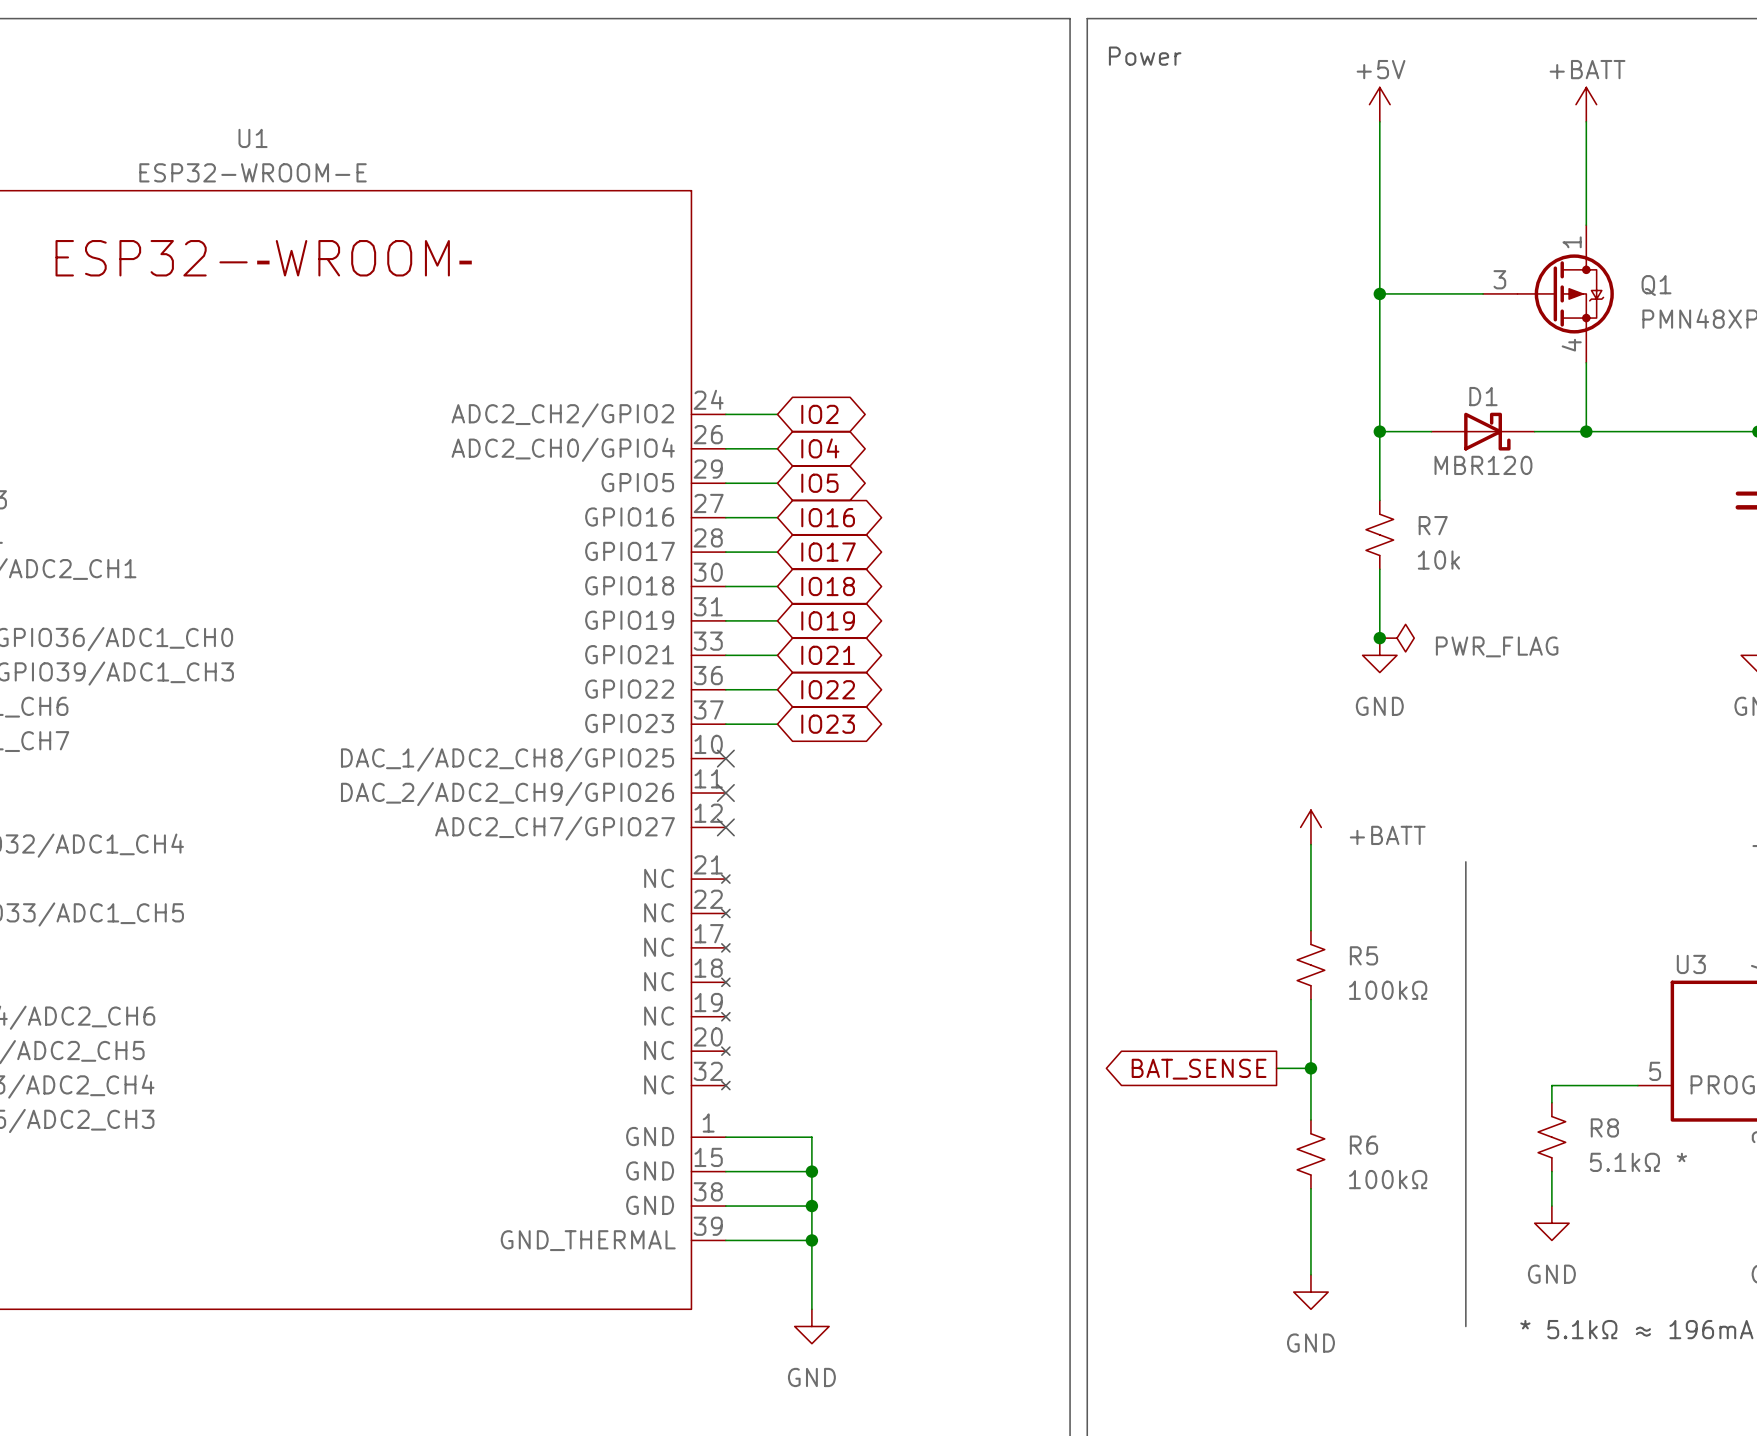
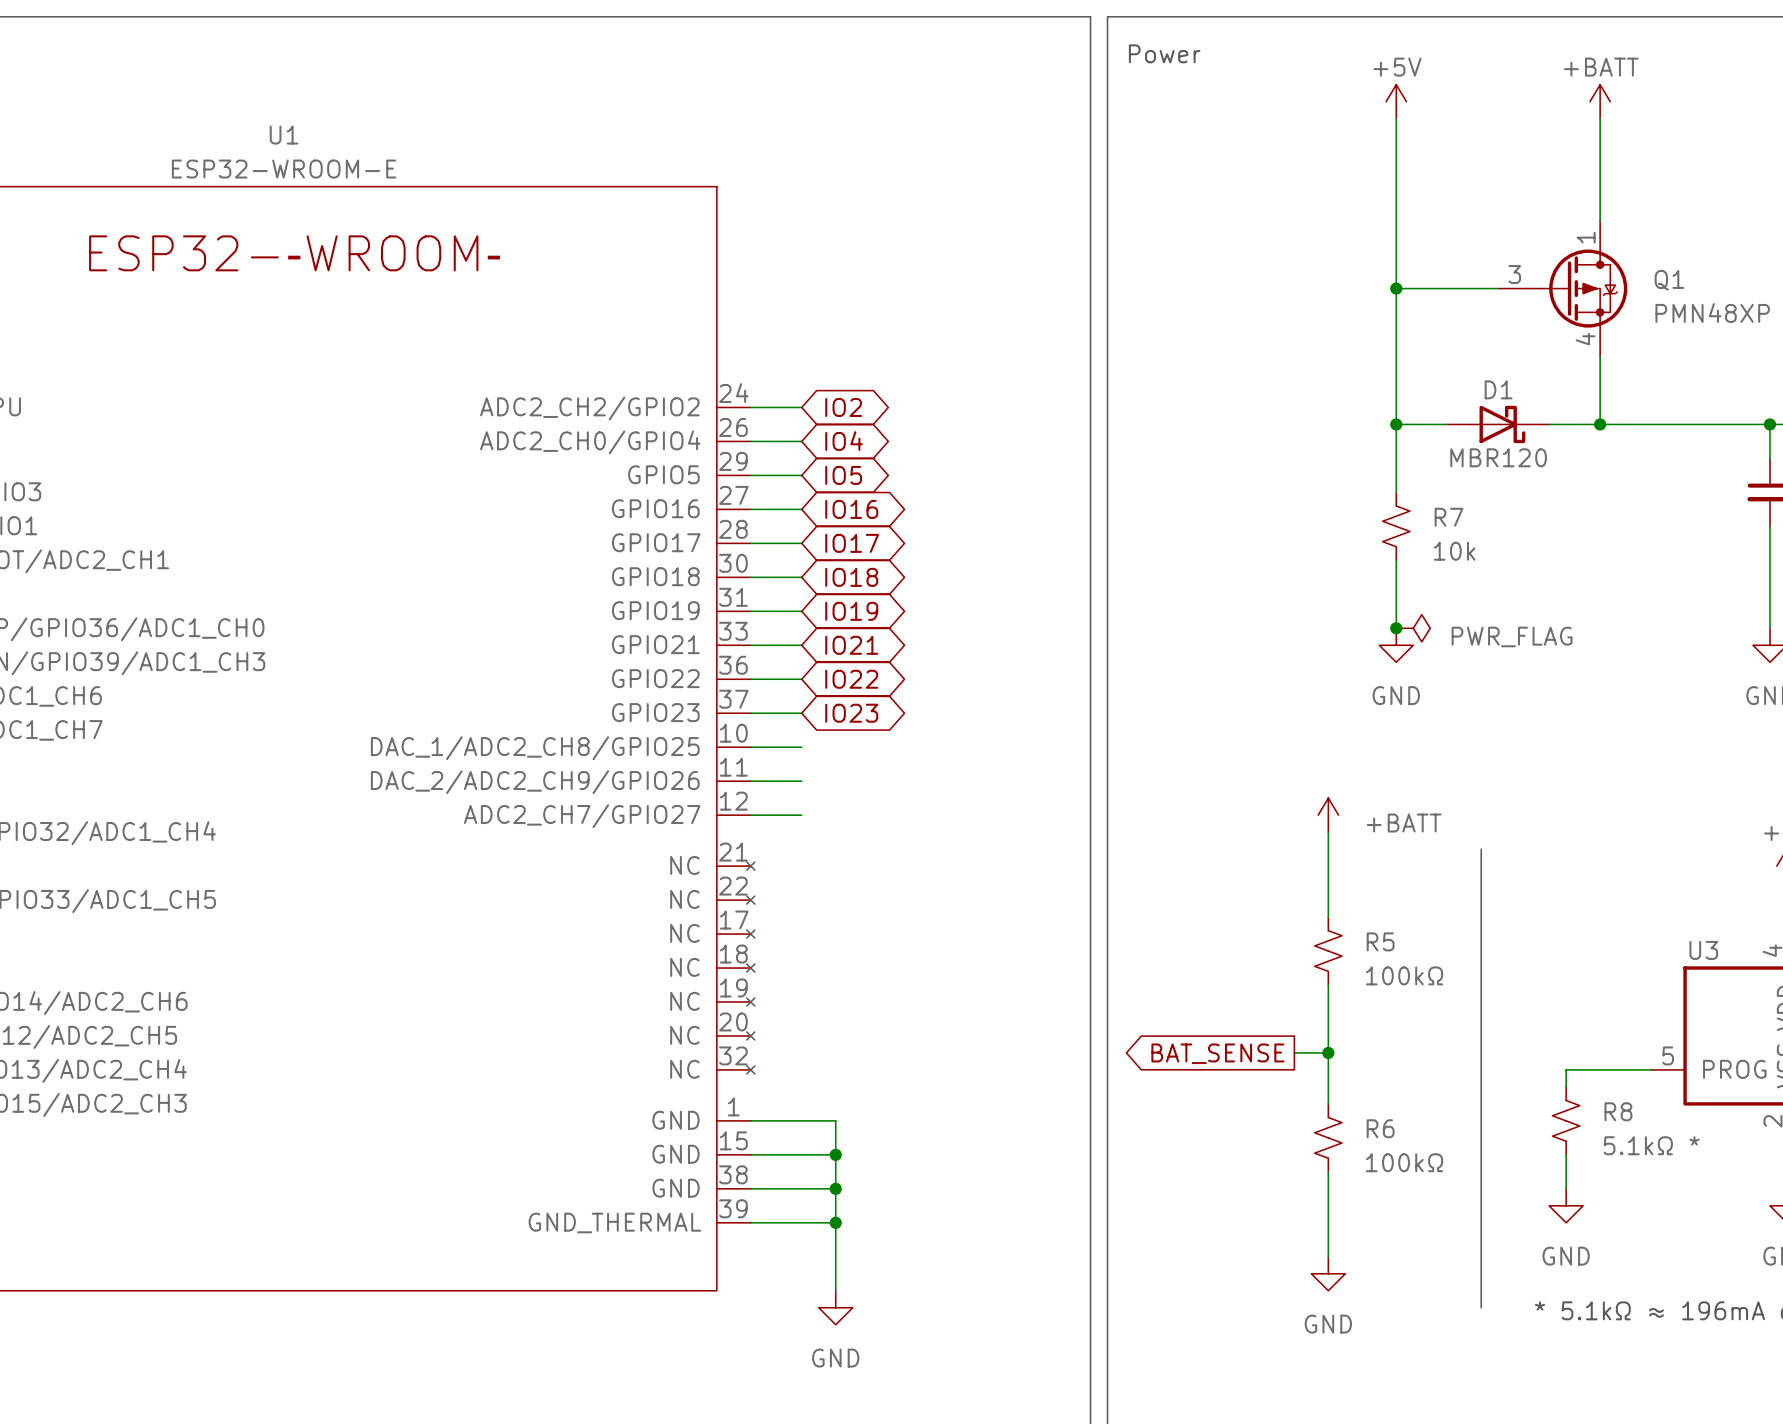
wire: none -> (750, 747) (801, 747)
no-connect mark: (725, 758) -> none
wire: none -> (750, 781) (801, 781)
no-connect mark: (725, 793) -> none
wire: none -> (750, 815) (801, 815)
no-connect mark: (725, 827) -> none

